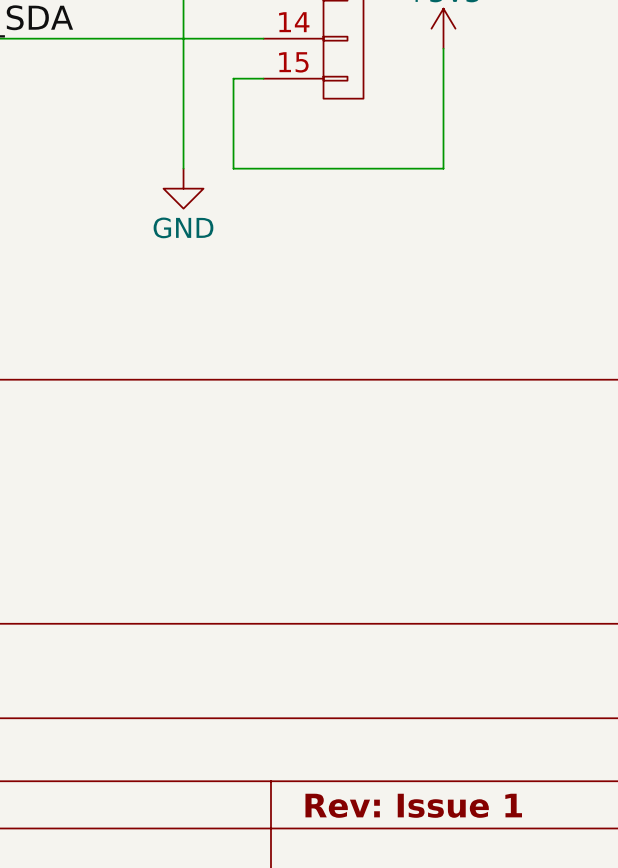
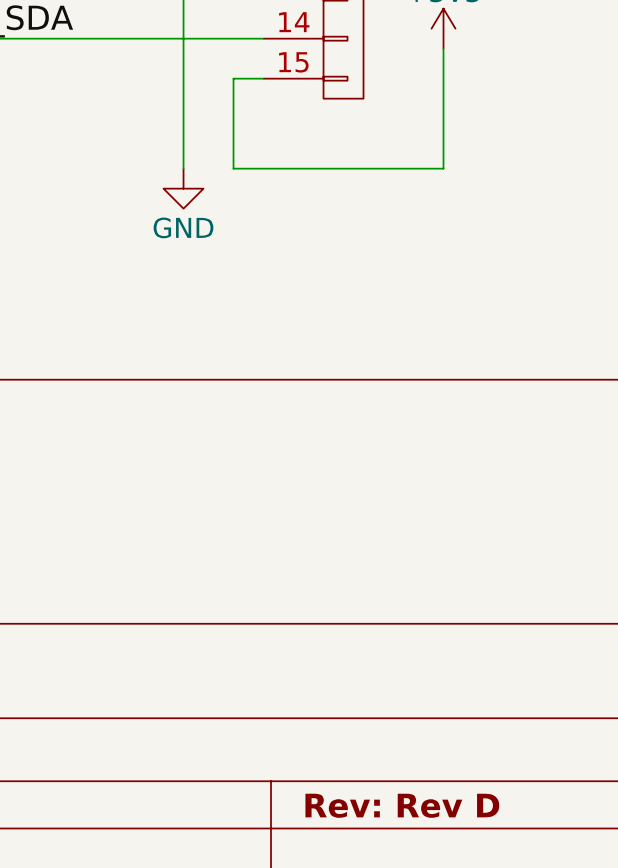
title block: Rev: Issue 1 (413, 805) -> Rev: Rev D (402, 805)

